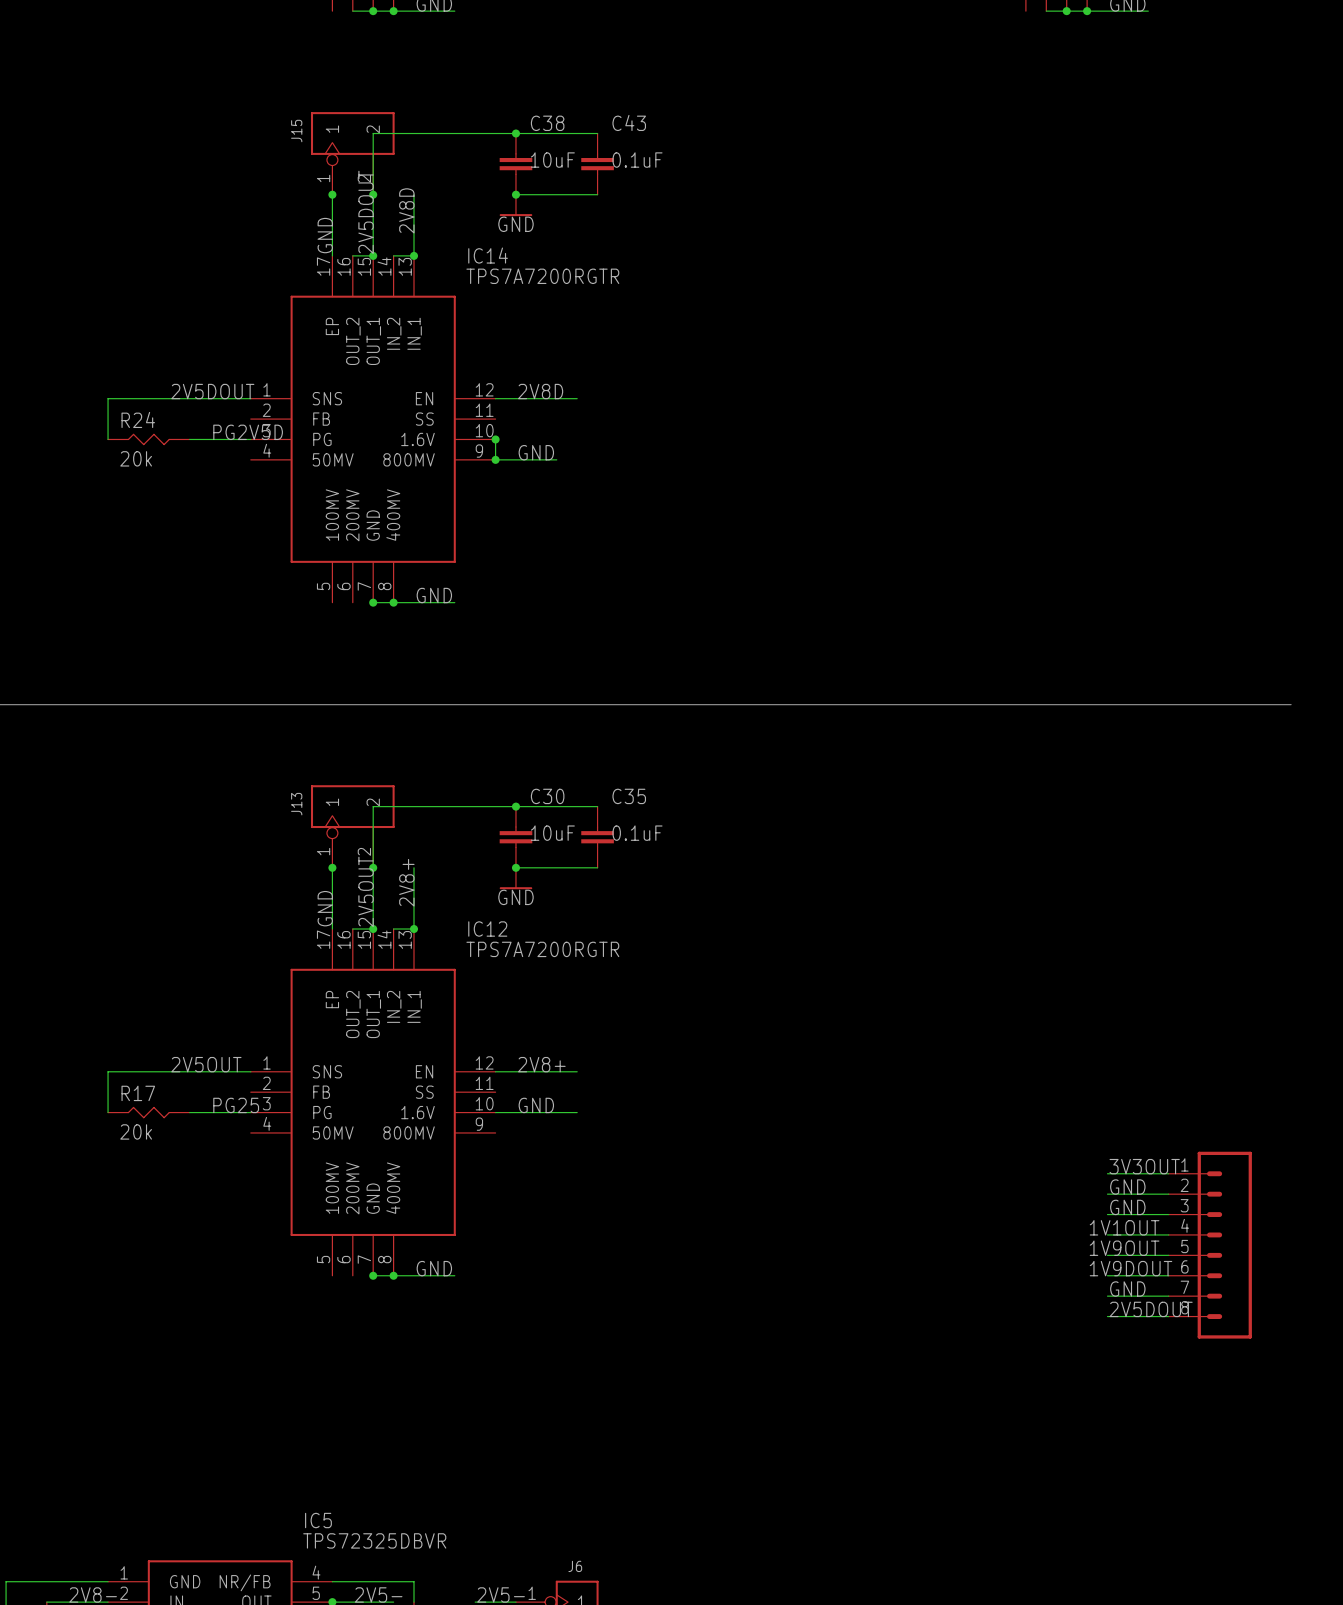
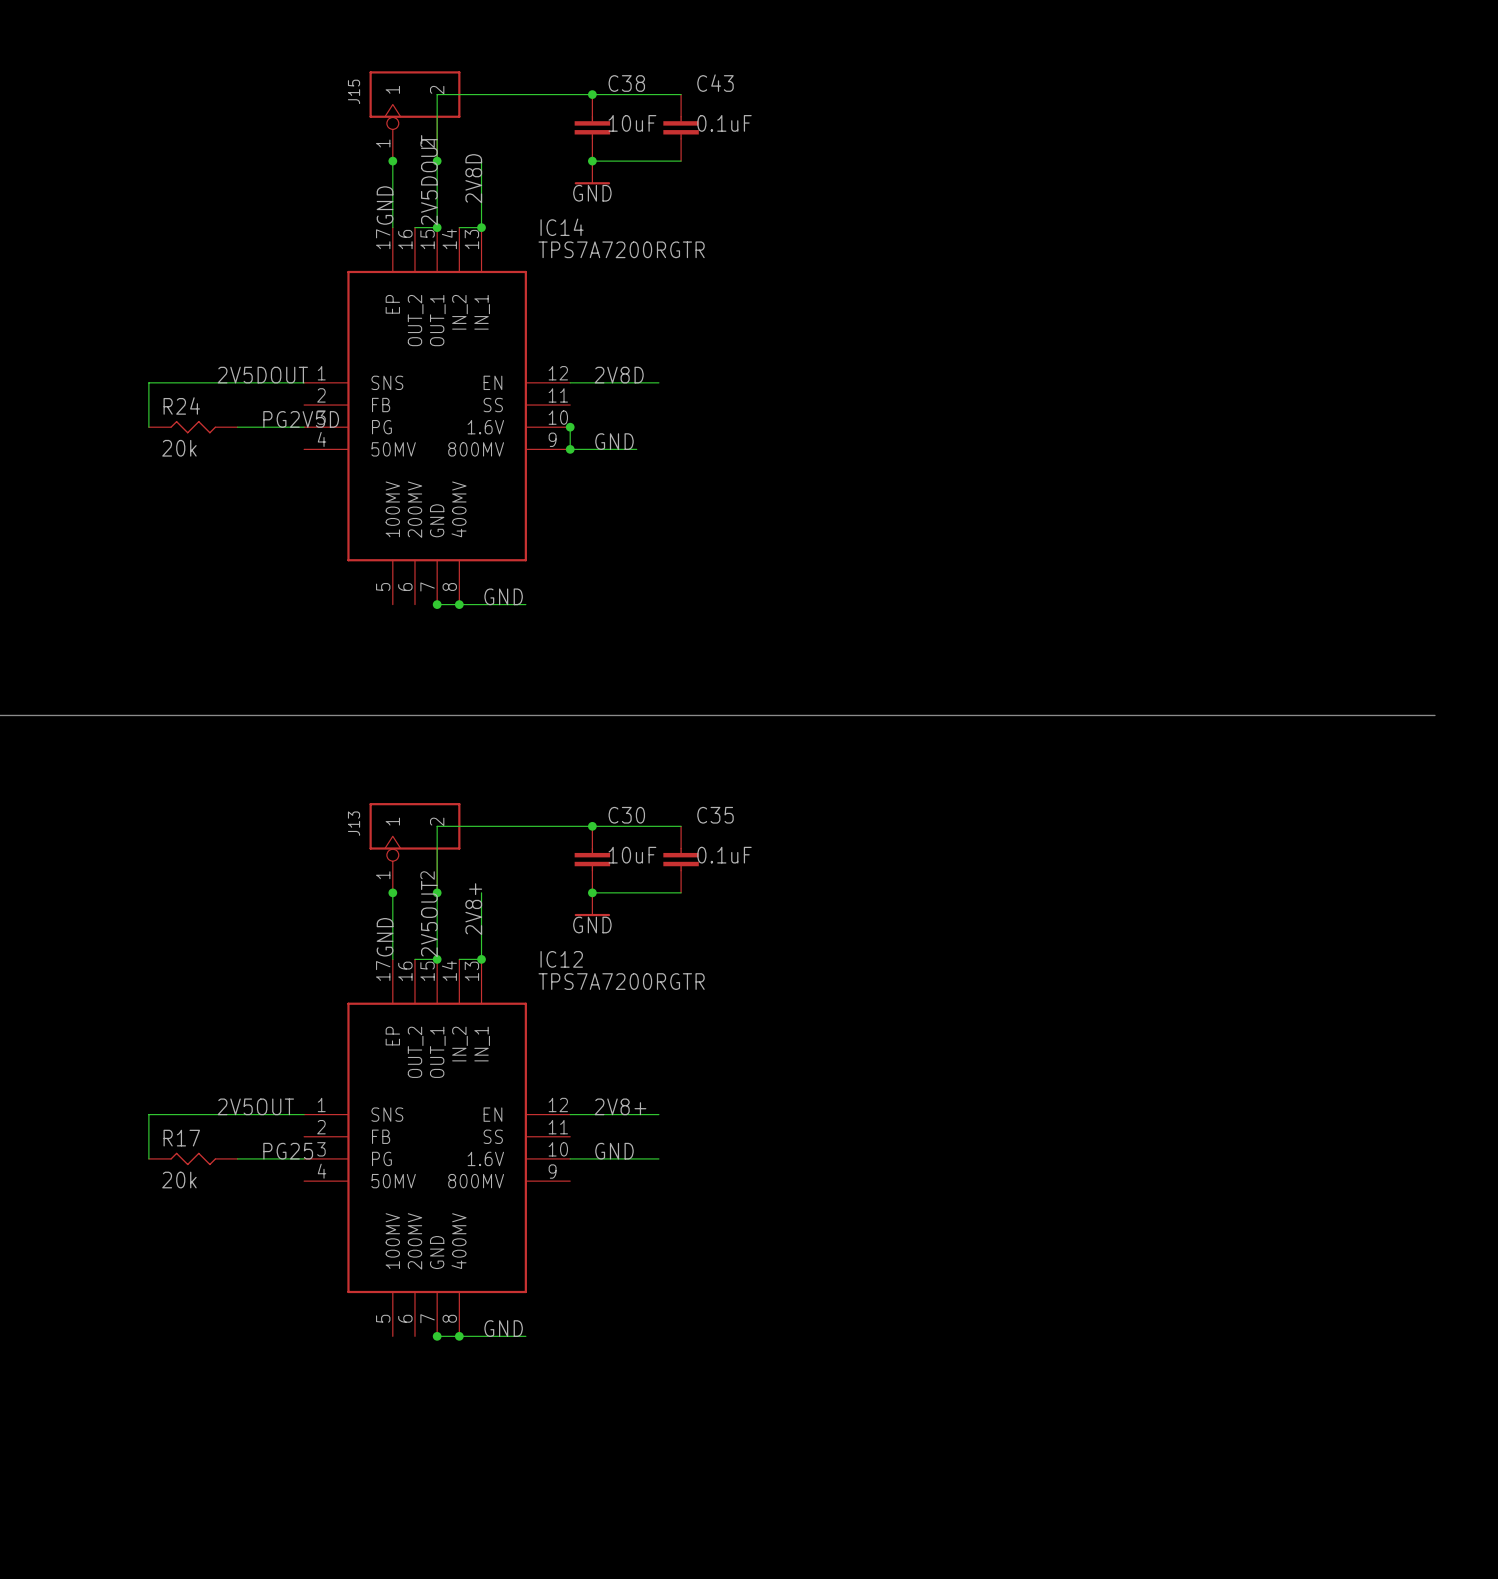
label: 3V3OUT (1144, 1166) -> none
wire: (1107, 1173) (1168, 1173) -> none
label: GND (1127, 1187) -> none
wire: (1107, 1194) (1168, 1194) -> none
label: GND (1127, 1207) -> none
wire: (1107, 1214) (1168, 1214) -> none
label: 1V1OUT (1124, 1227) -> none
wire: (1107, 1234) (1168, 1234) -> none
part: (1210, 1245) -> none
label: 1V9OUT (1124, 1248) -> none
wire: (1107, 1255) (1168, 1255) -> none
label: 1V9DOUT (1130, 1268) -> none
wire: (1107, 1275) (1168, 1275) -> none
label: GND (1127, 1289) -> none
wire: (1107, 1296) (1168, 1296) -> none
label: 2V5DOUT (1151, 1309) -> none
wire: (1107, 1316) (1168, 1316) -> none

